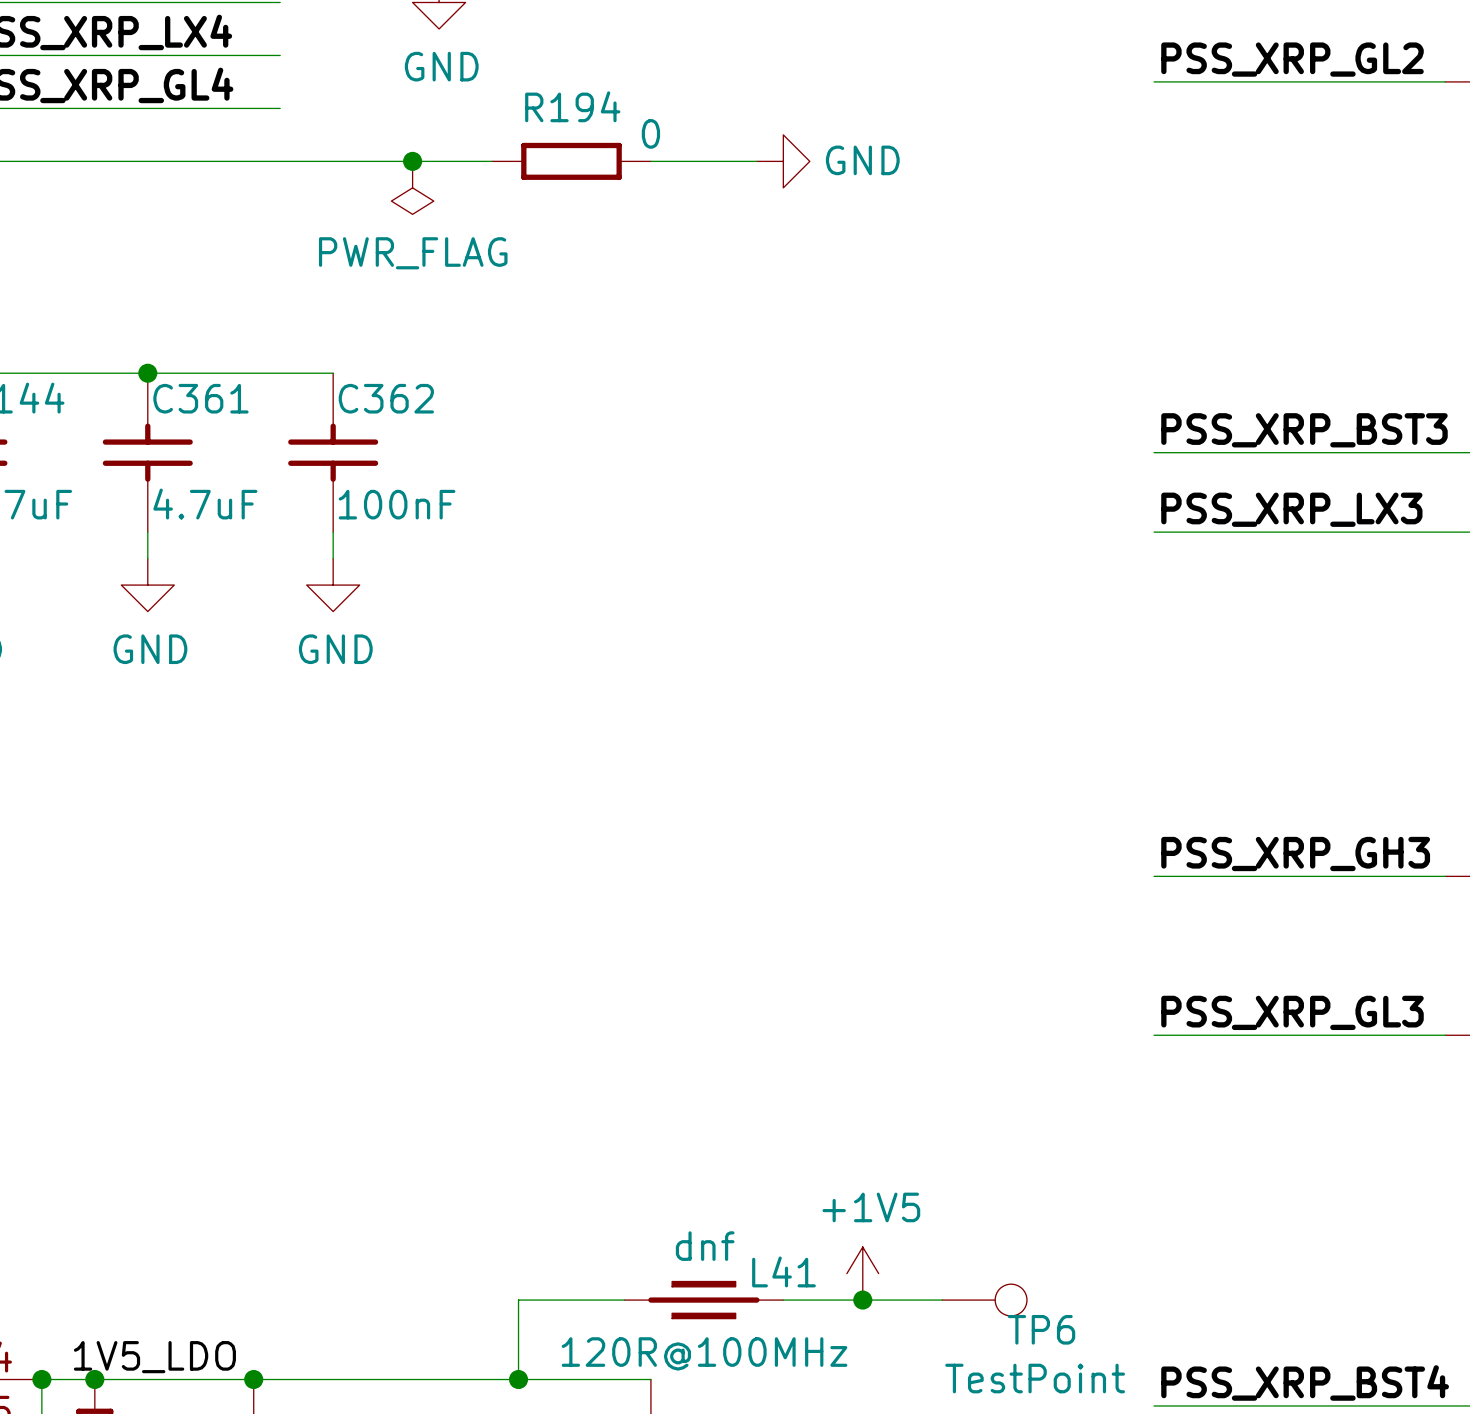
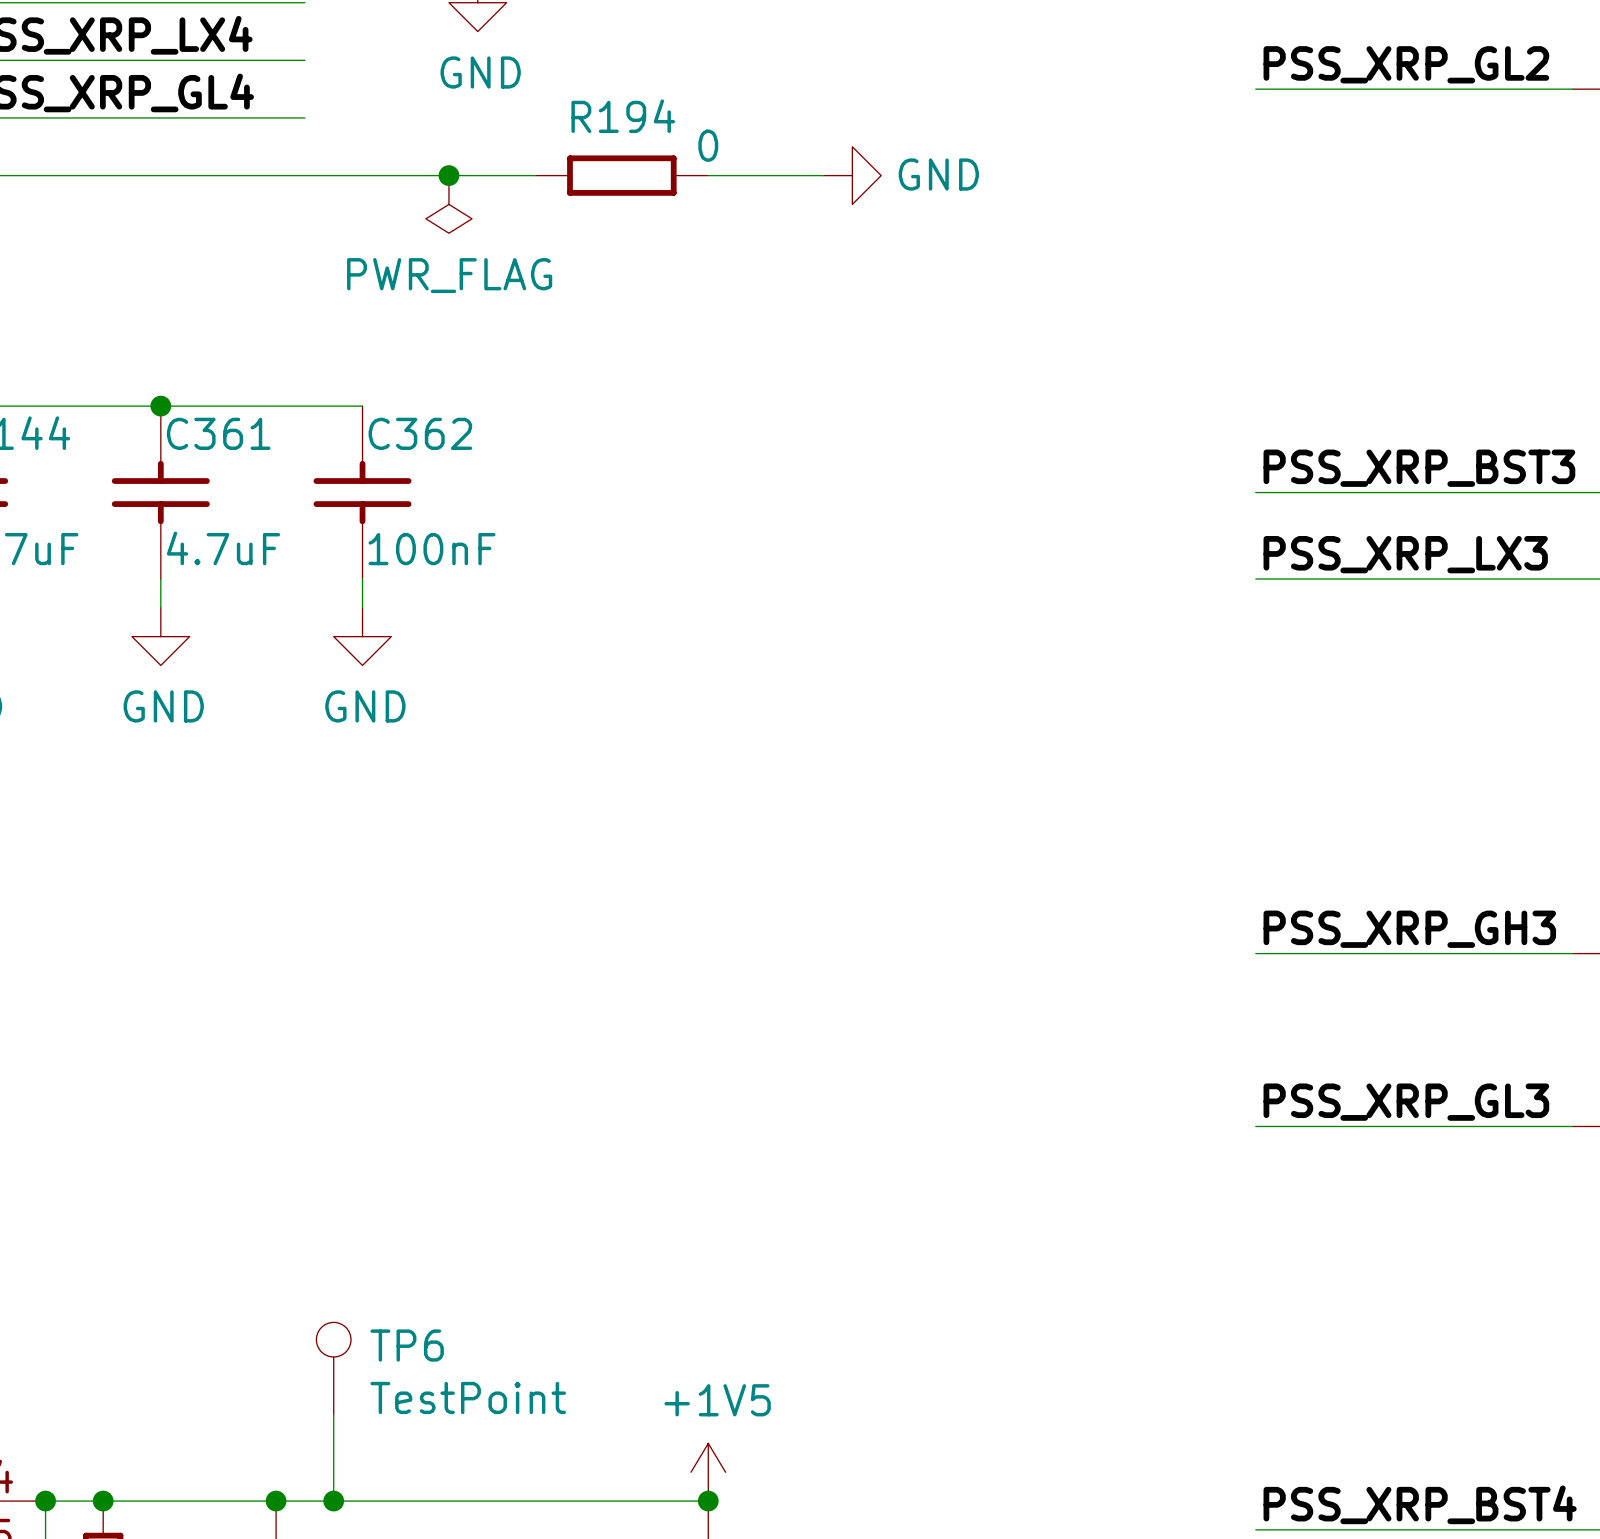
power symbol position: +1V5 (862, 1273) -> +1V5 (708, 1472)
wire: none -> (333, 1414) (333, 1501)
wire: (624, 1300) (518, 1300) (518, 1379) -> none
L41: (703, 1300) -> none
wire: (783, 1300) (942, 1300) -> none
junction: (862, 1300) -> none
TP6 position: (984, 1300) -> (333, 1368)
TP6 rotation: 0° (1011, 1300) -> 90° counterclockwise (333, 1339)
TP6 name position: TP6 (1041, 1329) -> TP6 (407, 1345)
label: 1V5_LDO (154, 1357) -> none
TP6 value position: TestPoint (1035, 1378) -> TestPoint (468, 1397)
junction: none -> (333, 1501)
junction: (518, 1379) -> none
junction: none -> (708, 1501)

